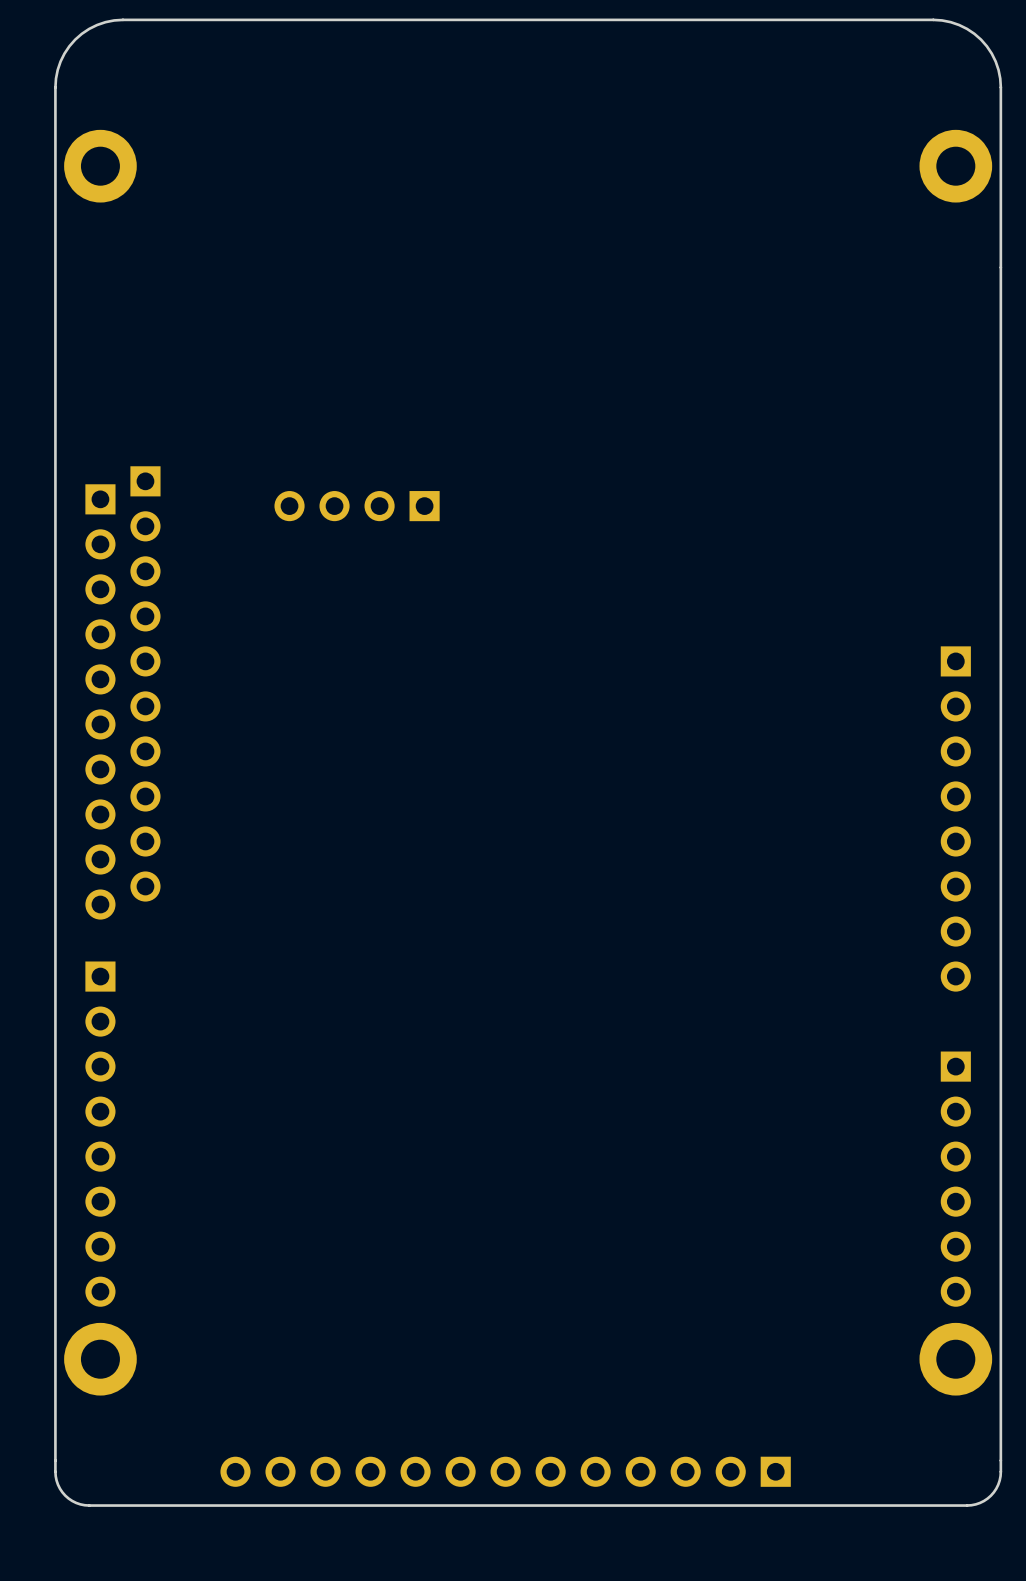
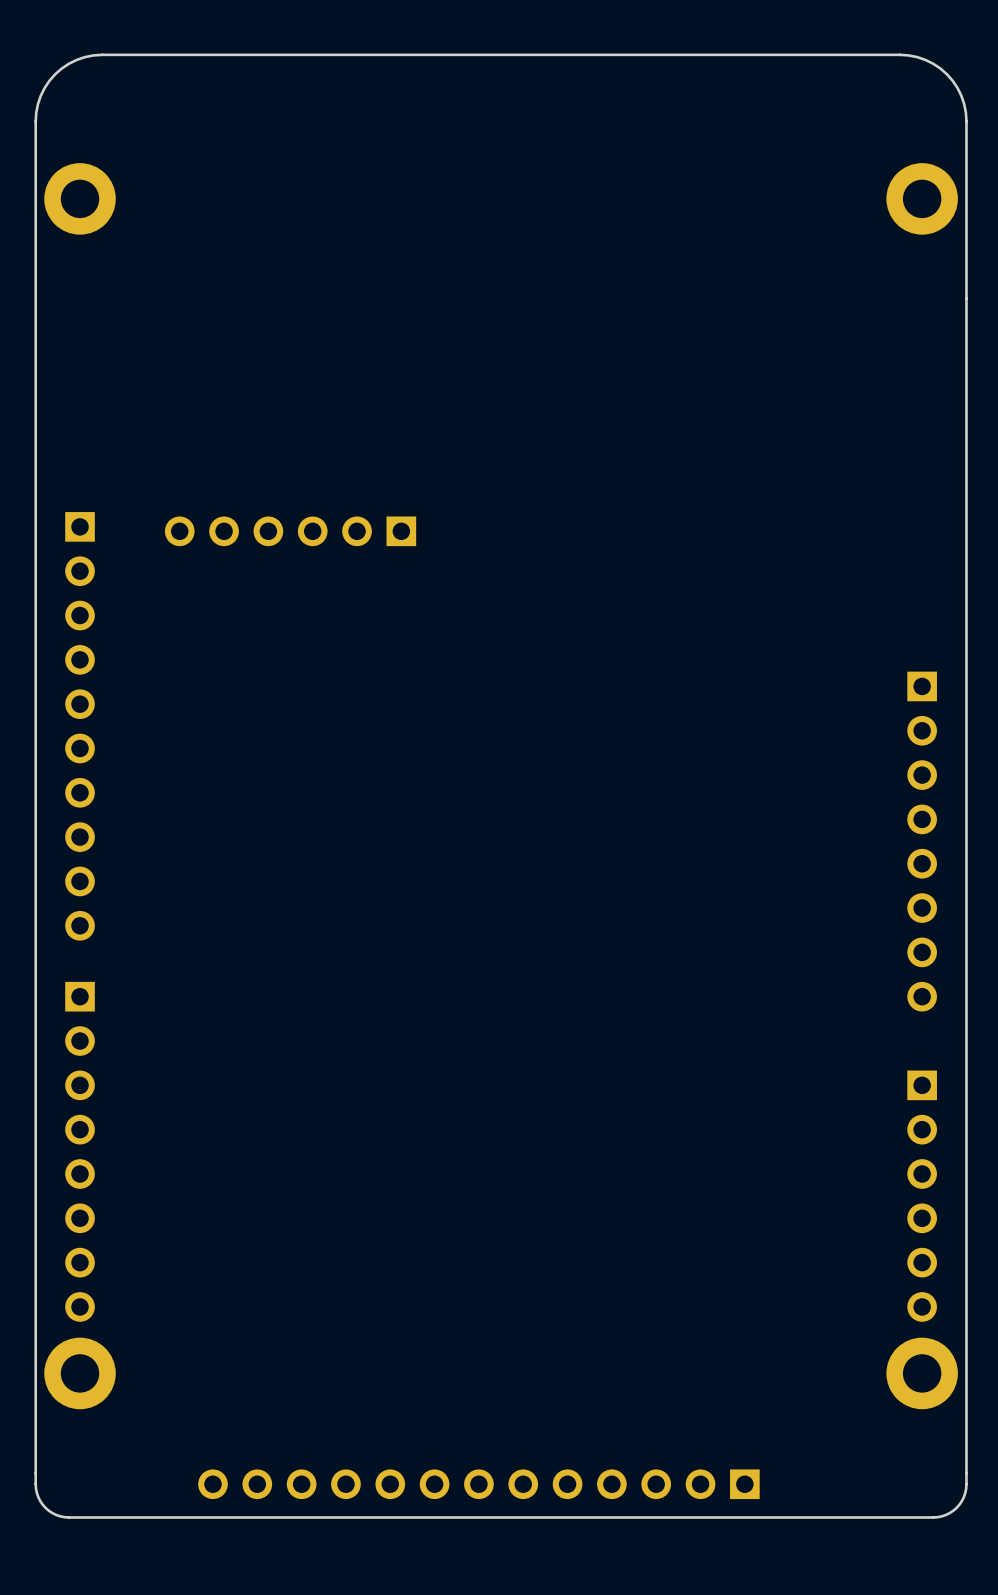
part: none -> (290, 531)
part: (357, 506) -> none
part: (145, 683) -> none

